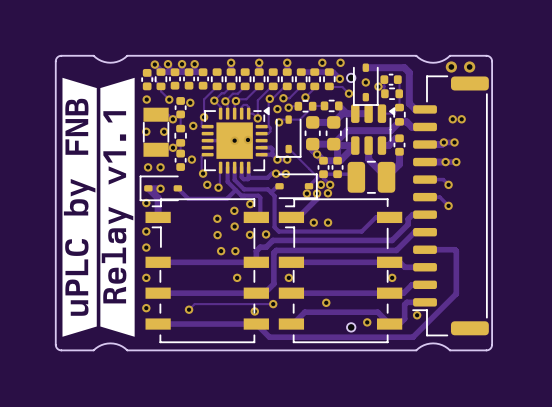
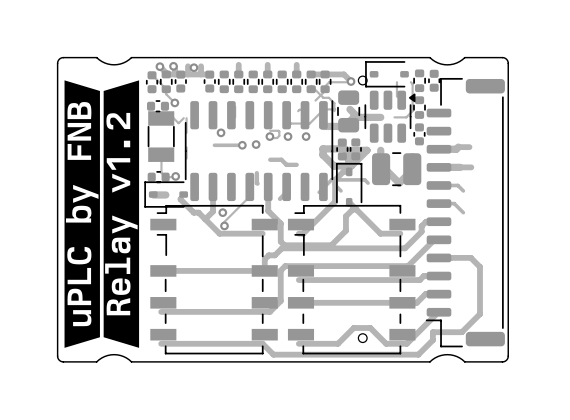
via: (231, 62) -> none
via: (259, 62) -> none
via: (287, 62) -> none
via: (322, 62) -> none
via: (340, 62) -> none
via: (182, 64) -> none
via: (194, 64) -> none
via: none -> (193, 67)
track: (365, 67) (404, 67) (409, 72) (409, 103) (415, 109) (425, 109) -> none
via: (451, 67) -> none
via: (469, 67) -> none
drawing shape: [100, 77, 135, 337] -> [103, 80, 140, 348]
part: (189, 78) -> none
part: none -> (419, 80)
part: none -> (434, 80)
part: (329, 79) -> none
track: none -> (347, 82) (329, 82) (325, 86)
part: (391, 79) -> none
via: (365, 82) -> none
track: none -> (311, 85) (323, 97) (328, 97) (334, 103) (334, 111)
part rotation: 0° (365, 84) -> 90° clockwise (386, 74)
track: (217, 86) (204, 99) (204, 117) (201, 119) (201, 126) (207, 126) -> none
track: (231, 86) (214, 100) (220, 106) (220, 113) -> none
track: (245, 86) (237, 93) (232, 93) (225, 101) -> none
track: (259, 86) (246, 99) (237, 99) (234, 102) (234, 113) -> none
track: (273, 86) (257, 100) (257, 118) (253, 113) (248, 113) (248, 106) (246, 104) (241, 106) (241, 113) -> none
track: (287, 86) (268, 99) (268, 126) (270, 128) -> none
track: (301, 86) (289, 98) (283, 98) -> none
track: (329, 86) (342, 86) (348, 93) -> none
via: (378, 86) -> none
via: (348, 93) -> none
part: (392, 93) -> none
via: (305, 97) -> none
via: (269, 98) -> none
via: (283, 98) -> none
via: (146, 99) -> none
part footprint: [320, 99, 343, 113] -> [337, 90, 361, 133]
via: (214, 100) -> none
via: (225, 101) -> none
via: (235, 101) -> none
part: none -> (158, 106)
via: (190, 102) -> none
part: none -> (419, 107)
part: (305, 106) -> none
part: (180, 107) -> none
via: (288, 107) -> none
via: (277, 109) -> none
part: (399, 114) -> none
via: (204, 117) -> none
via: (257, 118) -> none
via: (172, 119) -> none
via: (452, 119) -> none
via: (461, 119) -> none
via: (279, 122) -> none
via: (193, 125) -> none
track: (425, 126) (412, 127) (406, 121) (399, 121) (390, 130) (347, 130) (333, 144) -> none
via: none -> (221, 132)
part position: (370, 129) -> (389, 116)
via: (146, 131) -> none
via: (164, 131) -> none
via: none -> (269, 136)
via: none -> (288, 136)
via: none -> (306, 136)
part: (312, 133) -> none
part: (333, 133) -> none
part: (180, 135) -> none
part: (288, 136) -> none
track: (399, 138) (395, 138) (388, 145) (381, 145) -> none
part: (235, 140) -> none
via: (443, 142) -> none
via: (454, 142) -> none
part: none -> (342, 149)
part: none -> (355, 149)
part: none -> (259, 150)
part position: (399, 145) -> (419, 134)
via: (173, 147) -> none
track: (261, 147) (271, 147) (272, 154) -> none
track: (288, 149) (317, 178) -> none
track: none -> (161, 160) (161, 172) (165, 177) (175, 176)
track: (207, 154) (201, 156) (203, 173) -> none
via: (317, 154) -> none
via: (191, 159) -> none
via: (277, 159) -> none
via: (287, 159) -> none
part rotation: 0° (180, 160) -> 90° clockwise (158, 177)
part position: (180, 160) -> (158, 177)
via: (445, 162) -> none
via: (456, 162) -> none
track: none -> (349, 171) (343, 171) (335, 180) (335, 201) (303, 233) (298, 233)
via: (148, 167) -> none
via: (160, 167) -> none
track: (220, 167) (218, 187) -> none
track: (227, 167) (227, 181) (241, 195) (258, 195) (260, 197) (260, 213) (256, 217) -> none
track: (234, 167) (234, 179) (244, 189) (267, 189) (274, 196) (274, 227) (278, 231) (361, 231) (375, 217) (389, 217) -> none
track: (241, 167) (241, 177) (243, 179) (267, 177) (271, 173) (285, 173) -> none
part: (323, 167) -> none
part: (337, 167) -> none
via: none -> (175, 176)
via: (203, 173) -> none
via: (276, 173) -> none
via: (285, 173) -> none
part position: (371, 177) -> (396, 169)
part: none -> (349, 184)
track: none -> (213, 186) (213, 211) (205, 219)
track: none -> (249, 186) (249, 196) (222, 223)
track: none -> (268, 186) (268, 210) (280, 223) (280, 241) (284, 245) (331, 245) (345, 230) (345, 216) (352, 209) (356, 209)
via: (207, 184) -> none
via: (320, 184) -> none
via: (330, 184) -> none
via: (448, 184) -> none
part: (296, 186) -> none
via: (218, 187) -> none
track: (148, 188) (158, 198) (158, 217) -> none
via: (160, 188) -> none
track: (177, 188) (188, 198) (226, 198) (235, 190) -> none
track: none -> (180, 198) (193, 212) (198, 212) (219, 233) (262, 233)
via: (306, 193) -> none
track: (317, 193) (317, 198) (298, 217) (291, 217) -> none
via: (317, 193) -> none
via: (327, 193) -> none
track: none -> (349, 202) (380, 233) (400, 233)
via: (146, 203) -> none
via: (250, 204) -> none
via: none -> (222, 212)
via: (448, 205) -> none
via: (234, 210) -> none
via: (313, 222) -> none
via: (328, 222) -> none
via: (234, 226) -> none
via: (146, 231) -> none
track: (420, 232) (414, 232) (396, 250) (276, 250) (273, 252) (273, 283) (264, 293) -> (434, 239) (408, 266) (285, 266) (280, 270) (280, 301) (269, 311) (161, 311)
via: (250, 234) -> none
via: (266, 234) -> none
via: (217, 235) -> none
via: (146, 247) -> none
track: (454, 249) (456, 293) (413, 337) (269, 337) (256, 324) (158, 324) -> (469, 257) (479, 266) (479, 314) (461, 332) (432, 332) (432, 340) (418, 354) (273, 354) (262, 343) (161, 343)
via: (221, 251) -> none
via: (235, 251) -> none
track: (291, 262) (399, 262) (404, 267) (421, 267) -> none
track: none -> (445, 276) (423, 276) (419, 280) (298, 280)
via: (146, 277) -> none
via: (237, 277) -> none
via: (288, 277) -> none
via: (392, 277) -> none
track: (158, 293) (256, 293) -> none
via: (326, 302) -> none
track: (421, 302) (406, 302) (404, 304) (404, 318) (399, 324) -> none
track: none -> (445, 312) (438, 312) (406, 343) (386, 343) (370, 327) (353, 327) (337, 343) (298, 343)
track: (273, 304) (194, 304) (189, 309) -> none
via: (273, 304) -> none
via: (146, 308) -> none
via: (189, 309) -> none
via: (254, 311) -> none
via: (417, 315) -> none
via: (367, 322) -> none
track: (293, 324) (304, 312) (377, 312) (389, 324) -> none

